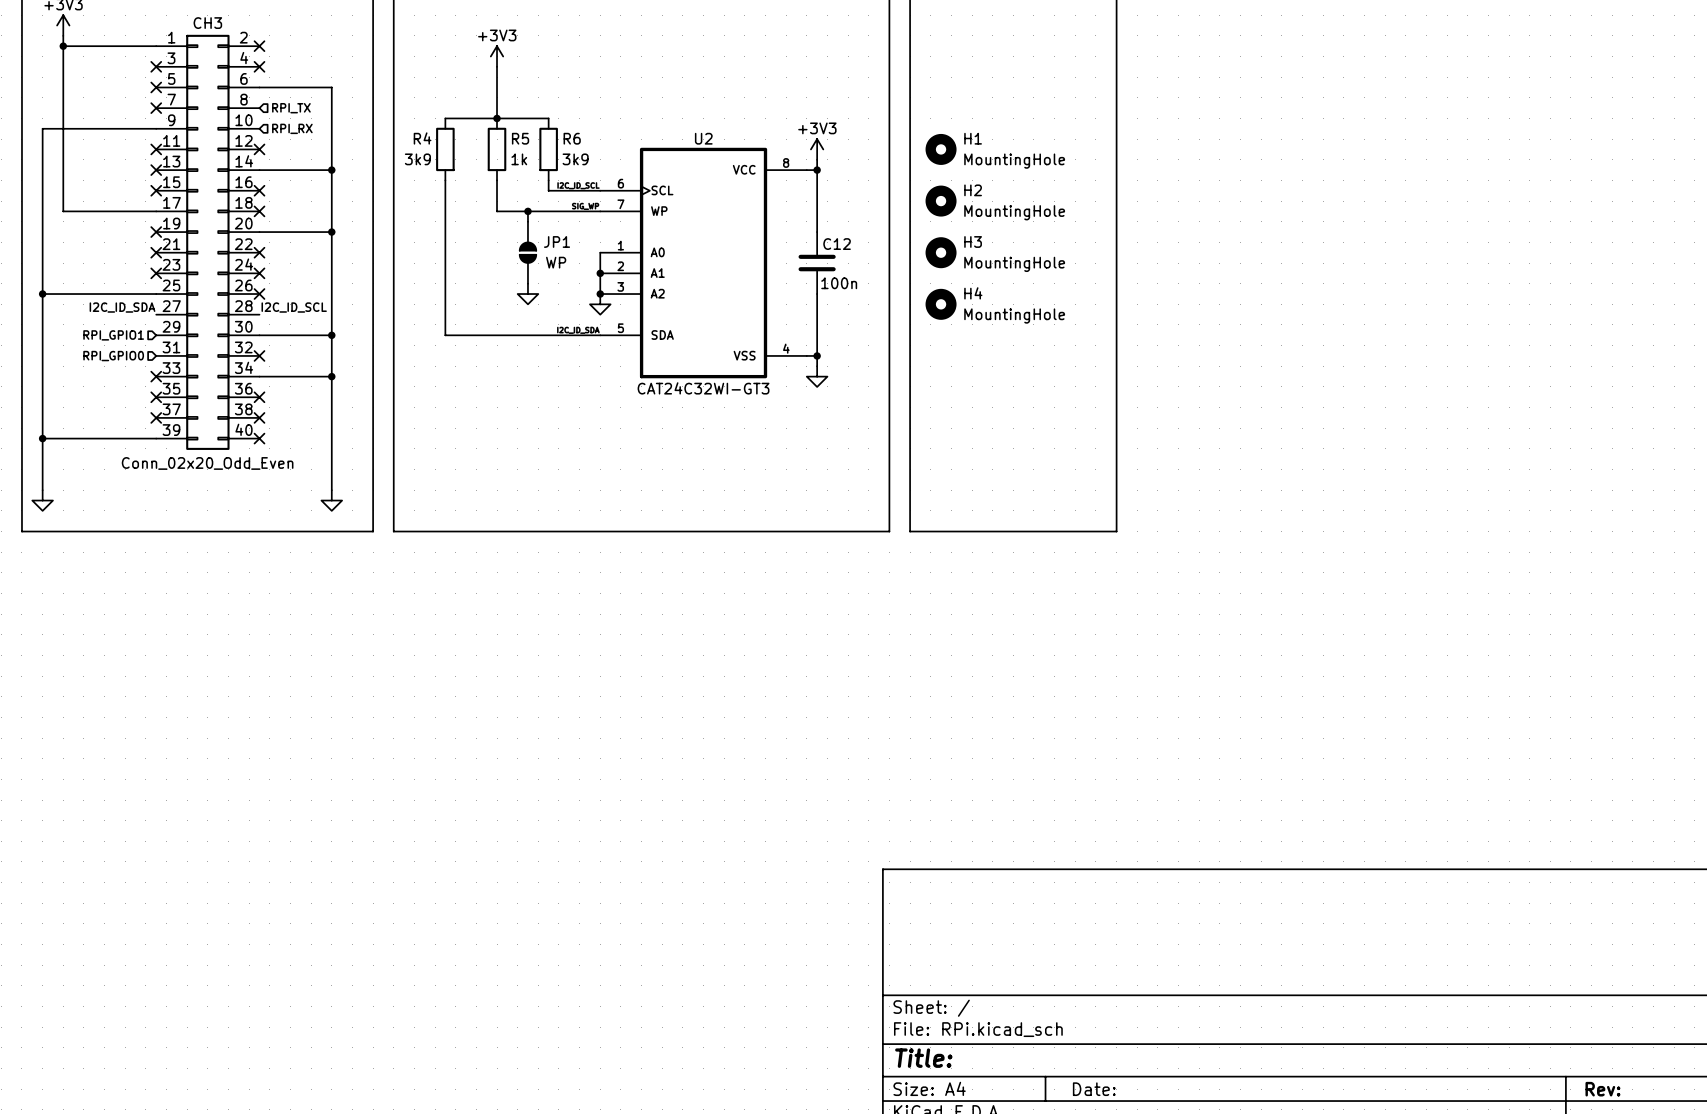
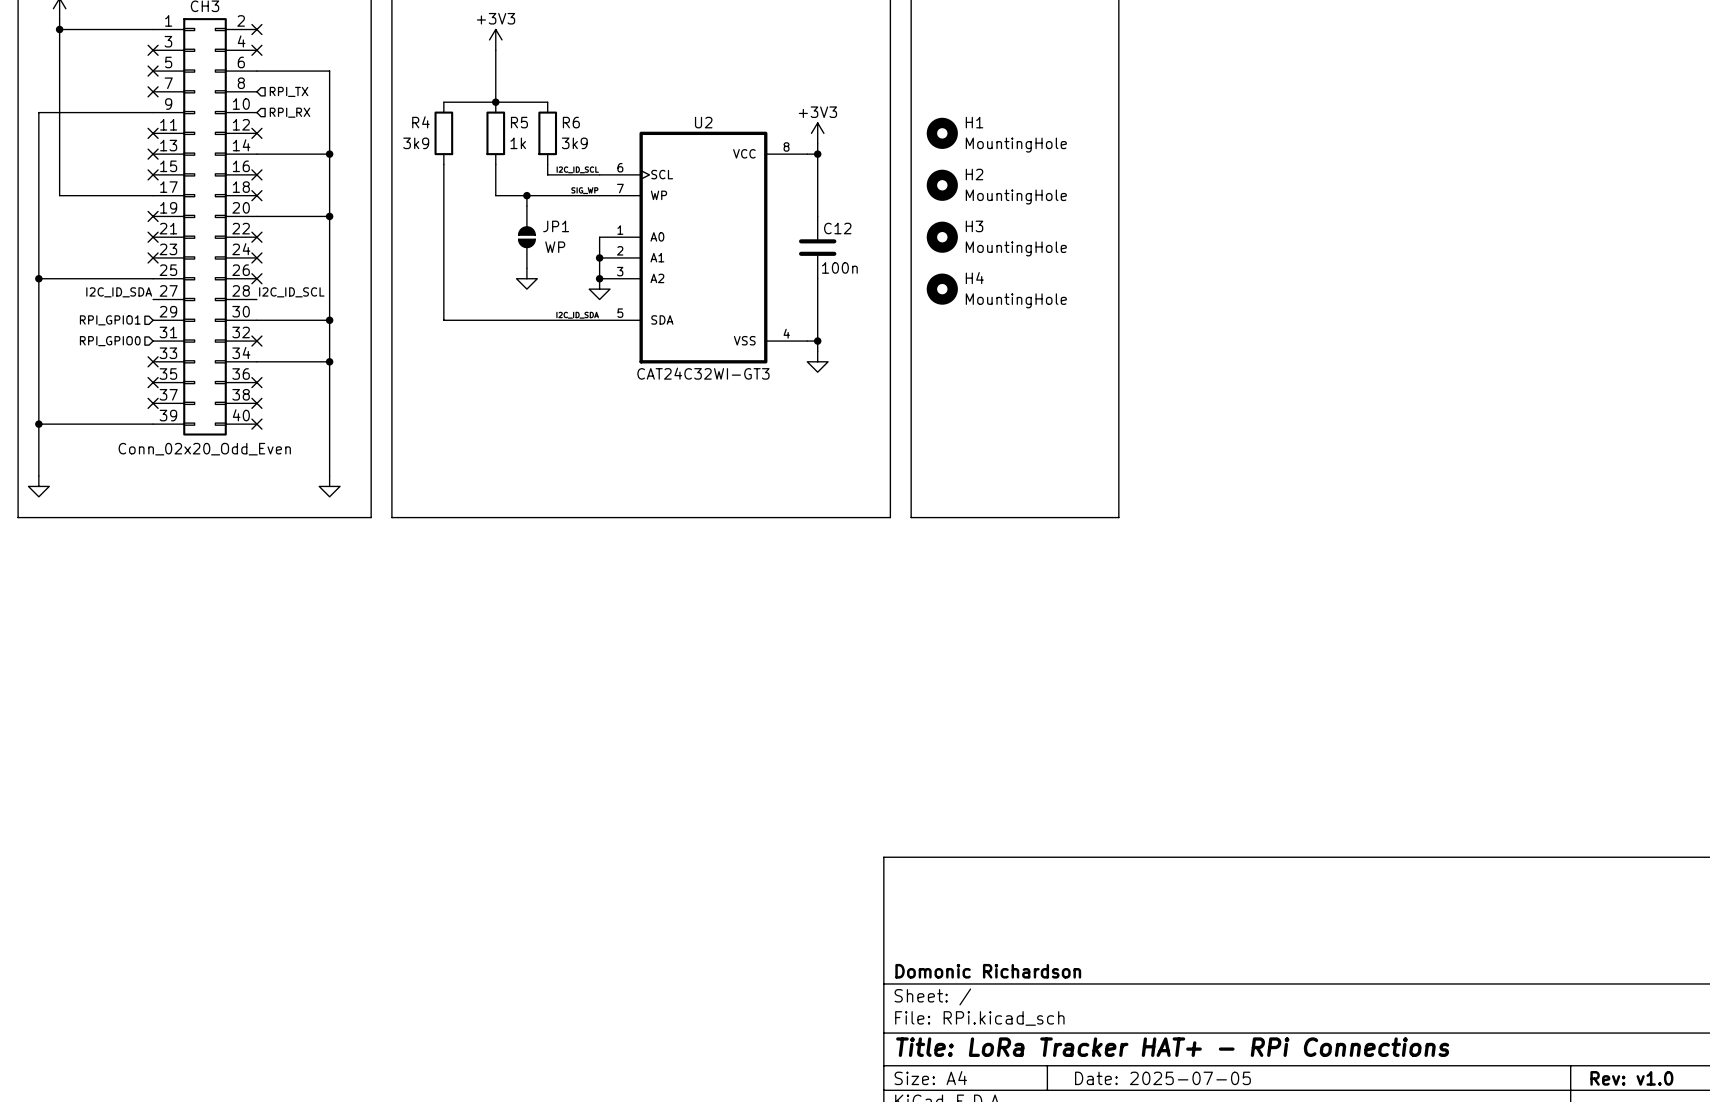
title block: none -> Domonic Richardson (988, 971)
title block: Title: (923, 1058) -> Title: LoRa Tracker HAT+ - RPi Connections (1172, 1047)
title block: Date: (1094, 1089) -> Date: 2025-07-05 (1162, 1078)
title block: Rev: (1602, 1089) -> Rev: v1.0 (1631, 1078)

